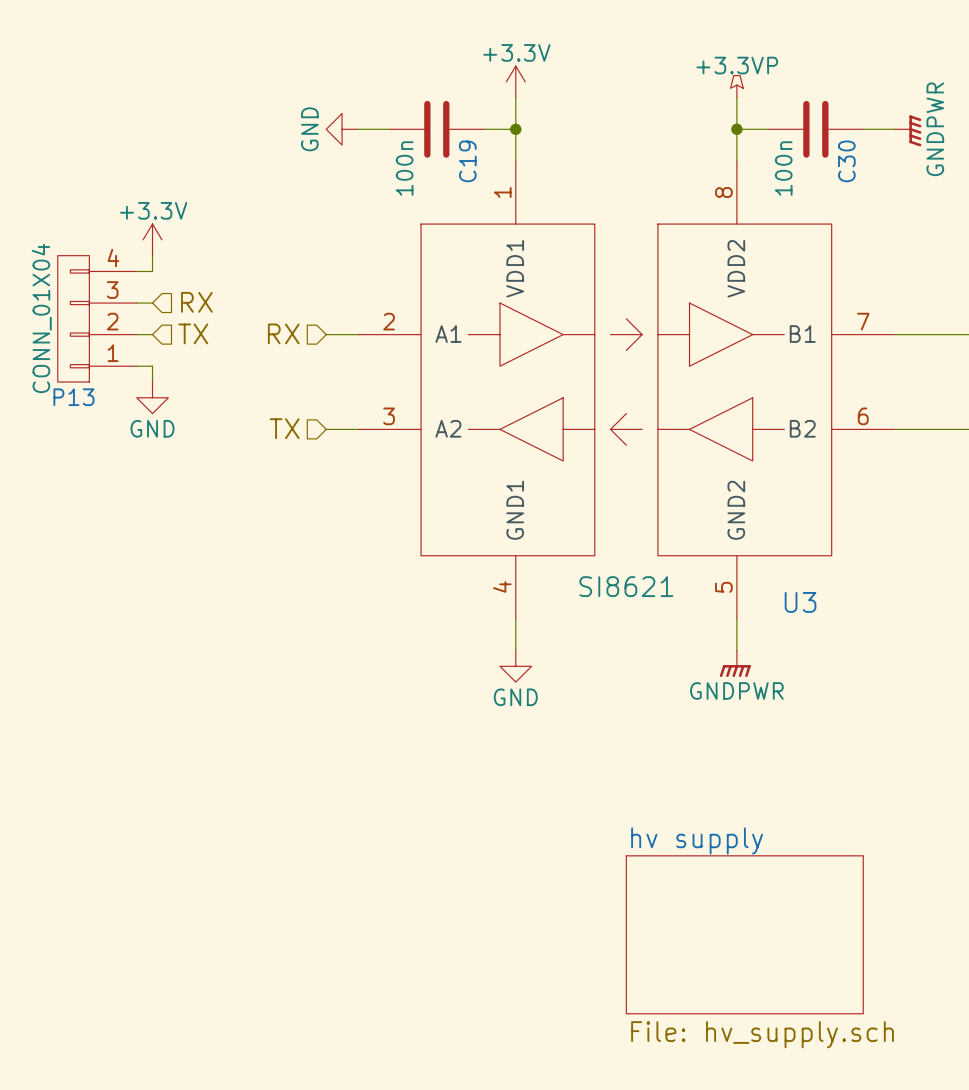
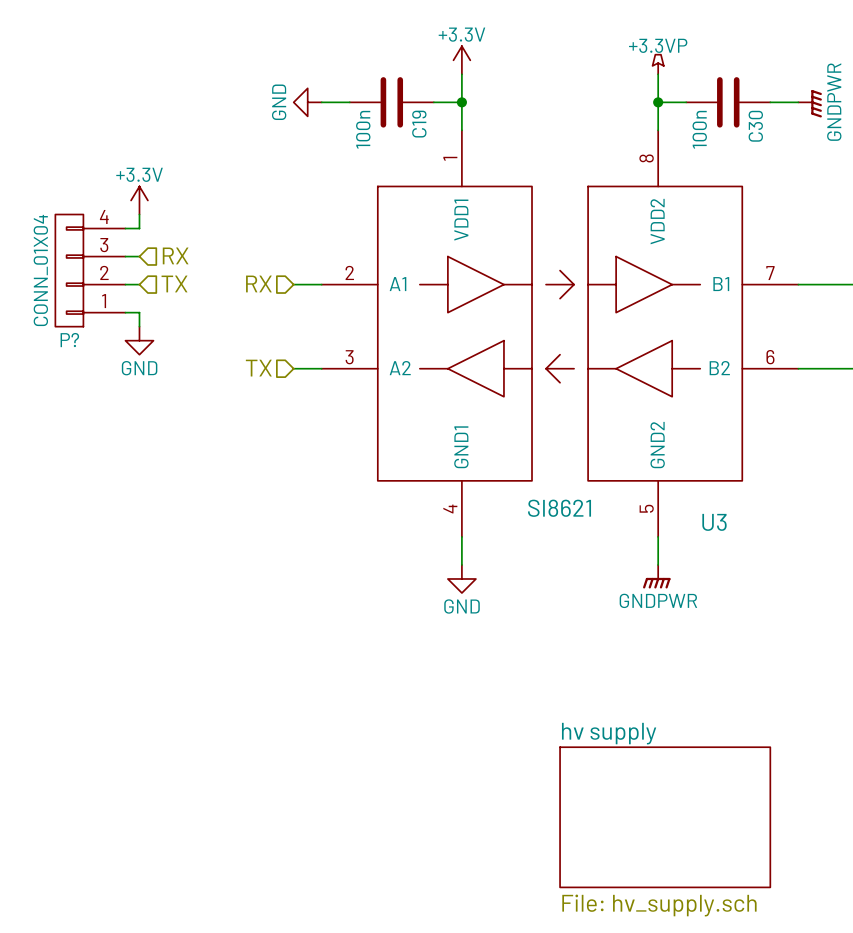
P13 name: P13 (73, 397) -> P? (69, 340)

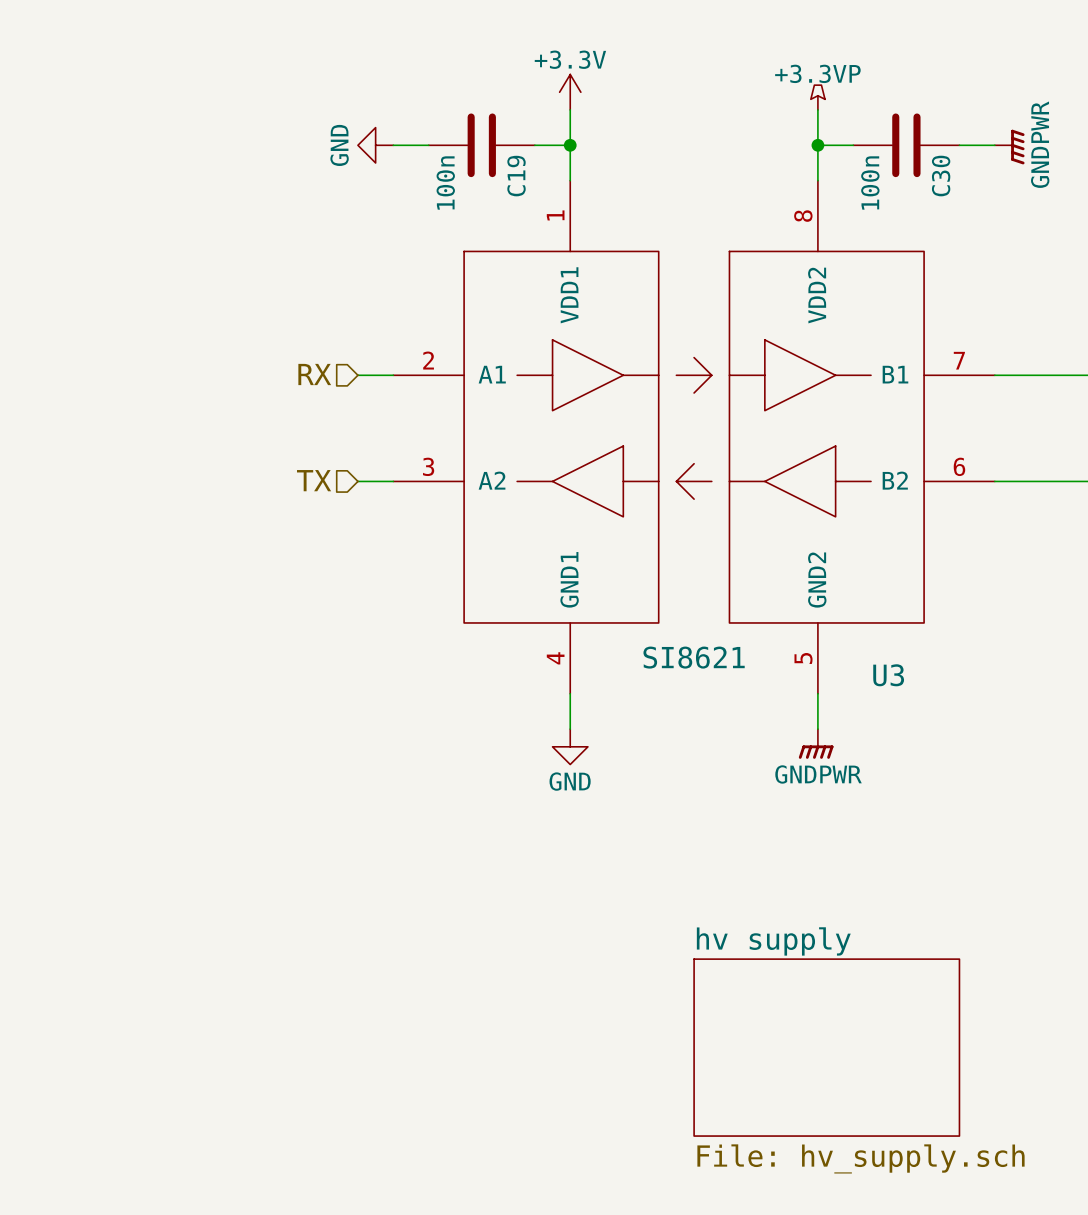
power symbol: +3.3V (139, 200) -> none
wire: (139, 214) (139, 228) (125, 228) -> none
hierarchical label: RX (175, 255) -> none
wire: (125, 256) (139, 256) -> none
P?: CONN_01X04 (90, 270) -> none
hierarchical label: TX (174, 283) -> none
wire: (125, 284) (139, 284) -> none
wire: (125, 312) (139, 312) (139, 326) -> none
power symbol: GND (139, 340) -> none

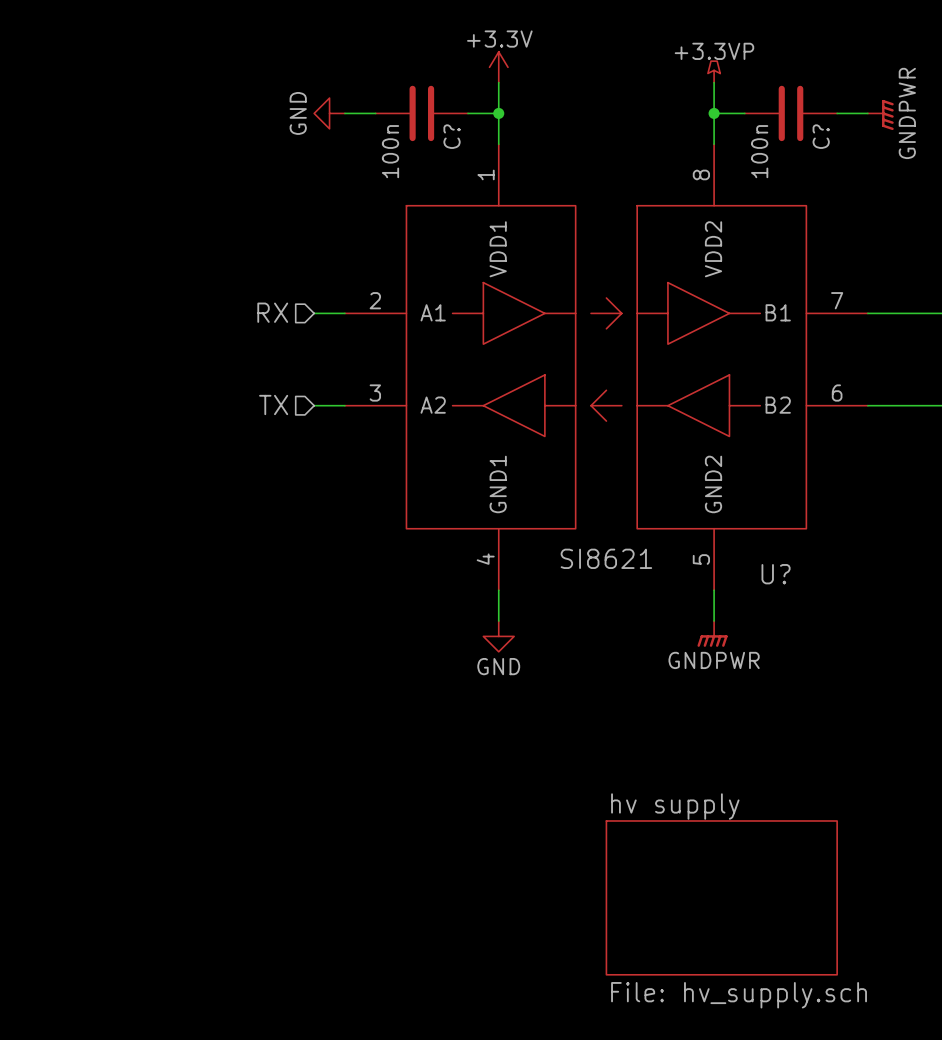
C19 name: C19 (516, 176) -> C? (452, 136)
C30 name: C30 (941, 176) -> C? (821, 136)
U3 name: U3 (888, 675) -> U? (776, 574)

